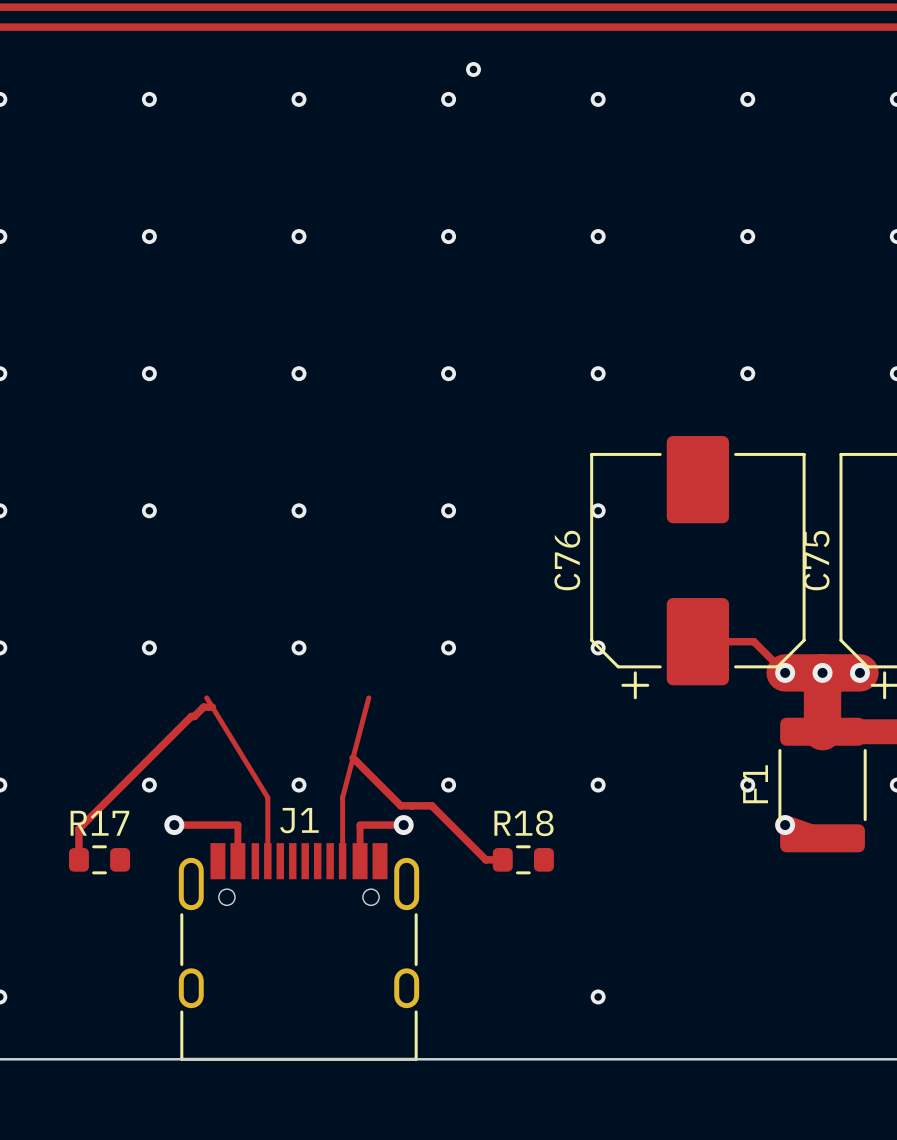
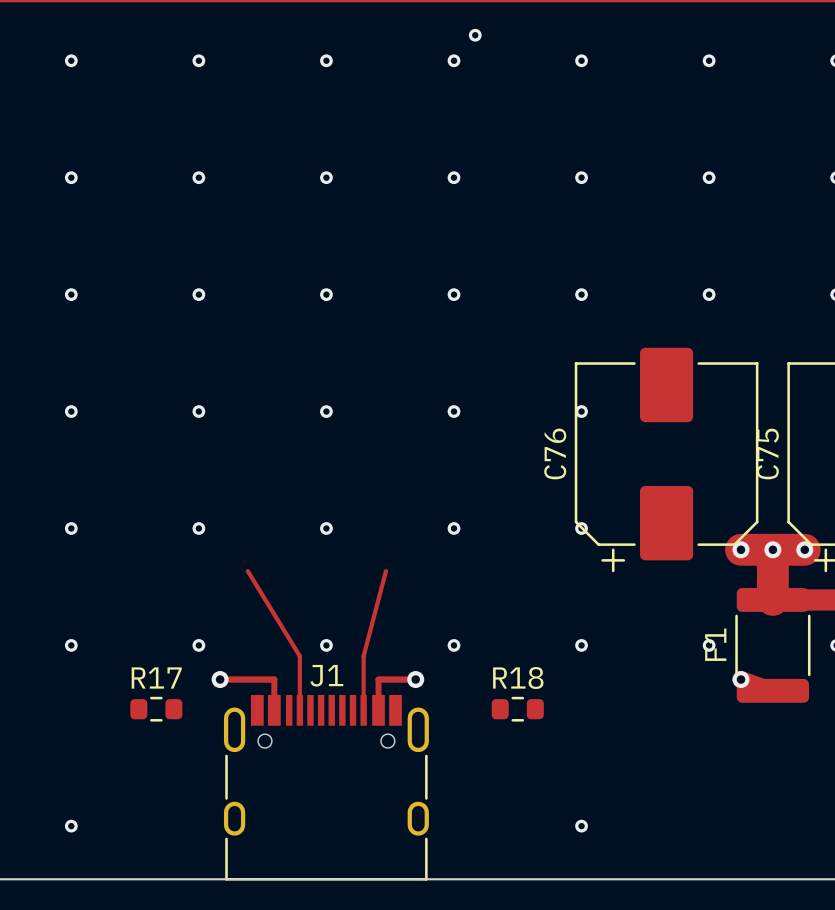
track: (697, 641) (753, 641) (785, 672) -> none
track: (212, 707) (203, 707) (194, 716) (191, 716) (78, 828) (78, 859) -> none
track: (353, 757) (400, 805) (431, 805) (485, 859) (502, 859) -> none

